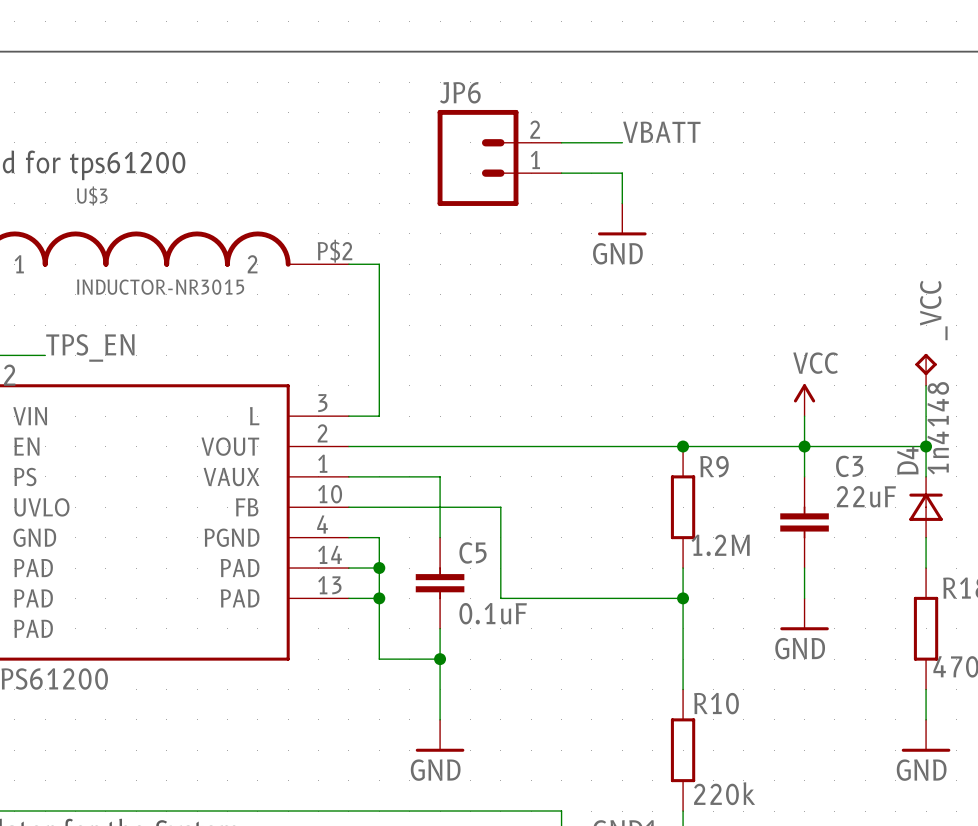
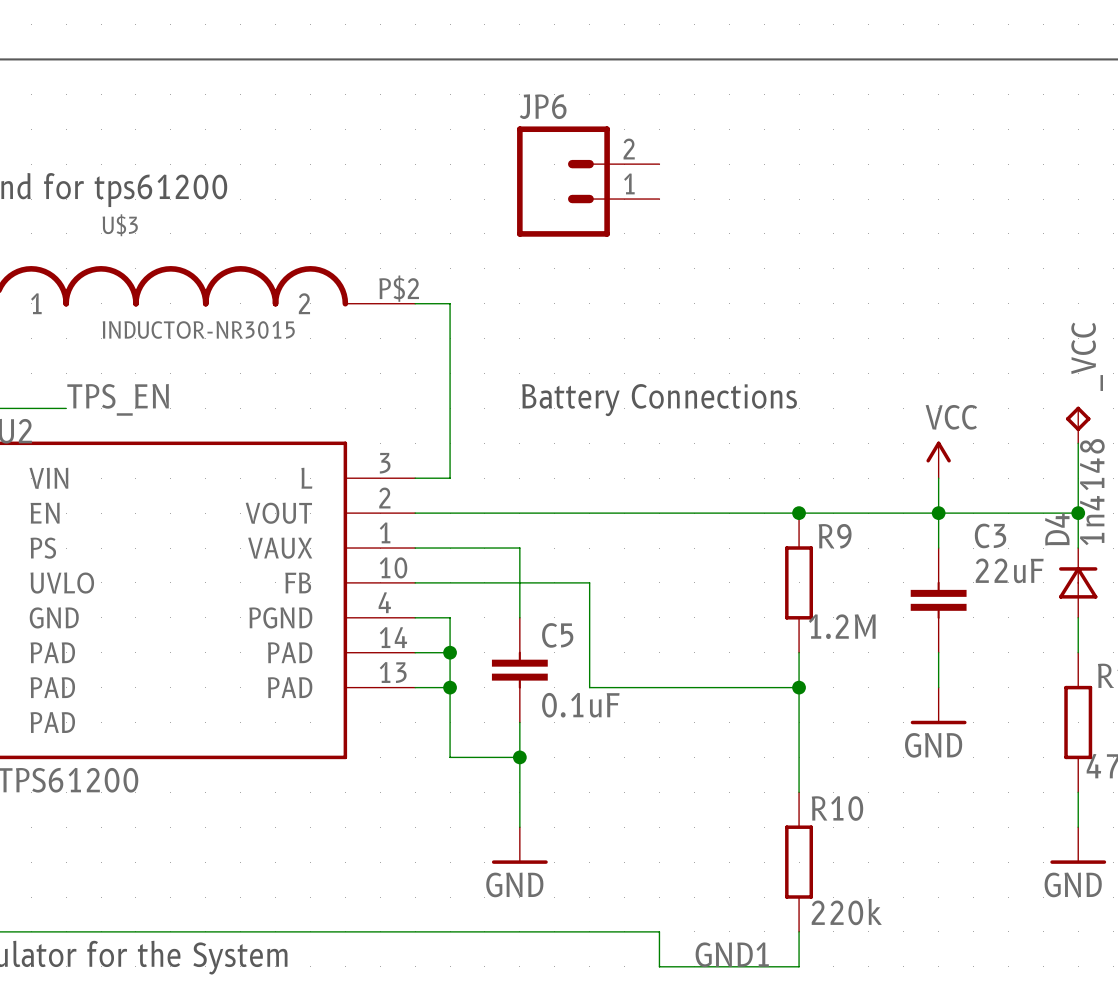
label: VBATT (661, 132) -> none
wire: (561, 142) (622, 142) -> none
wire: (561, 173) (622, 173) (622, 203) -> none
power symbol: GND (622, 219) -> none
text: none -> Battery Connections (659, 400)

